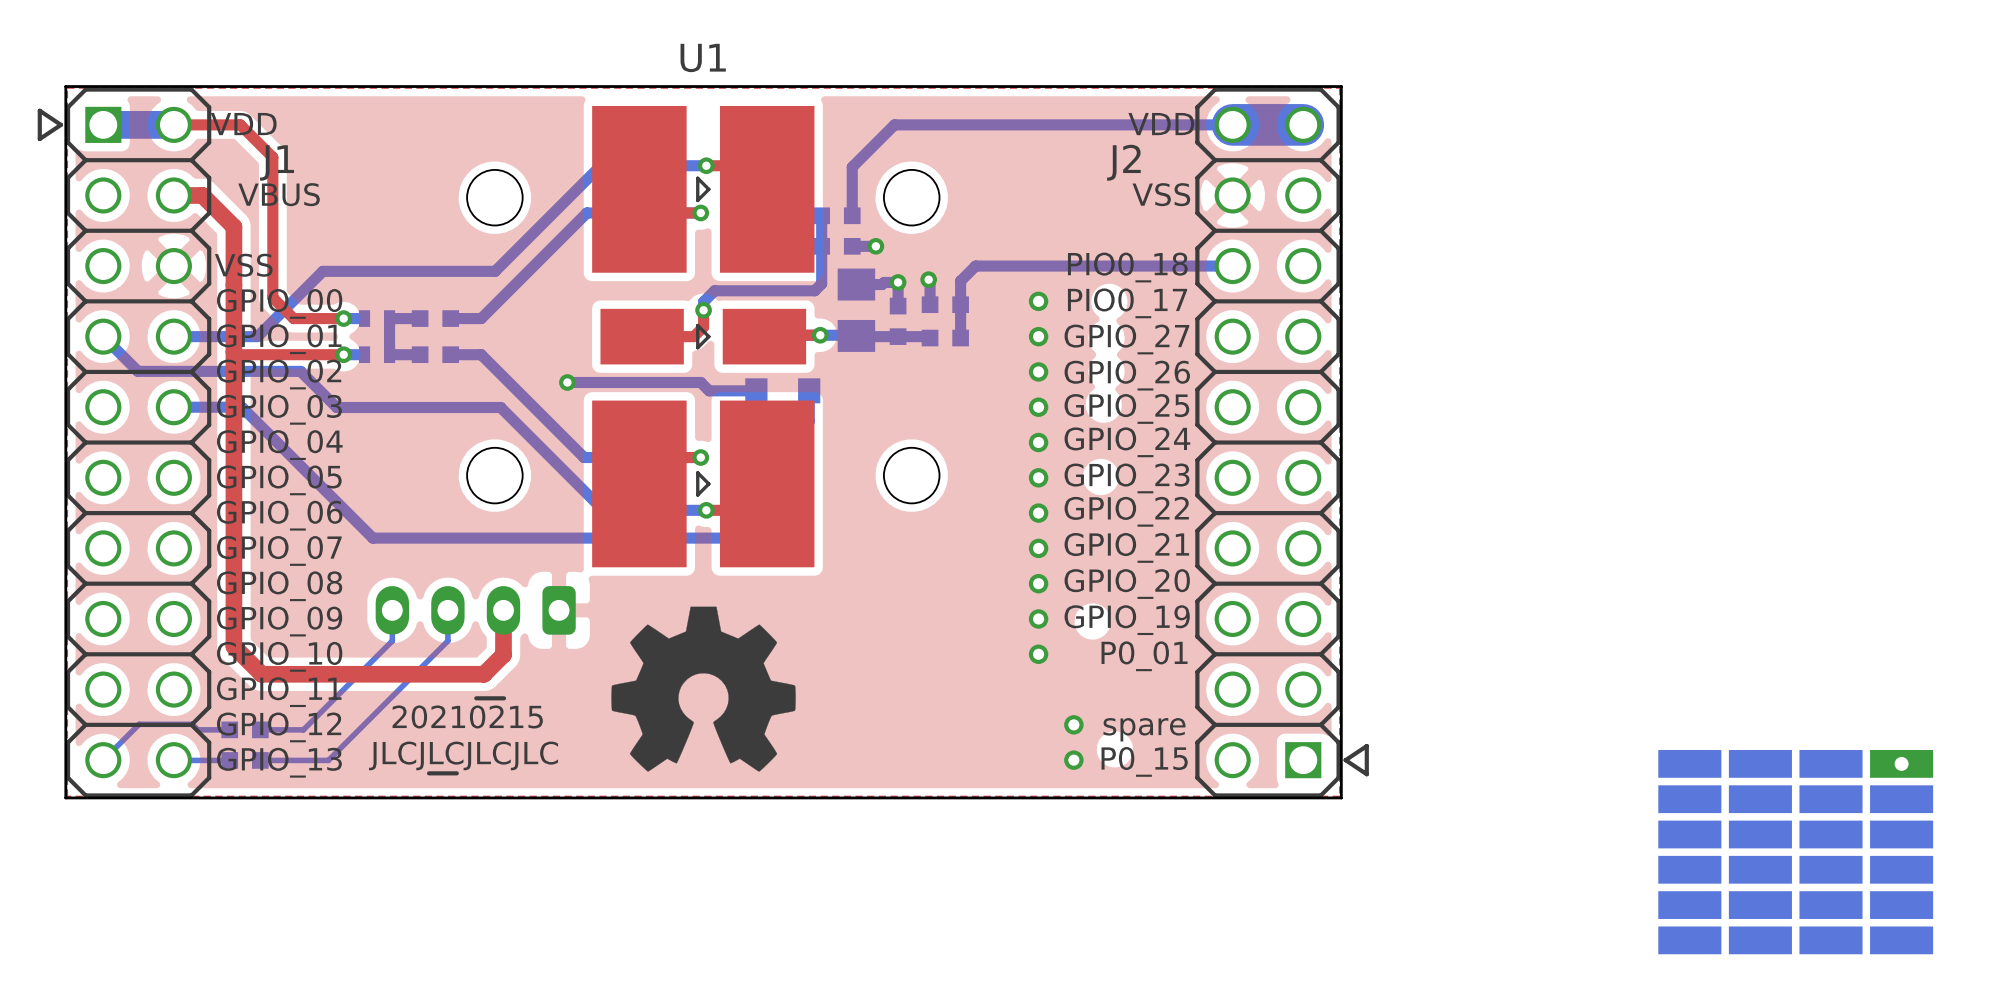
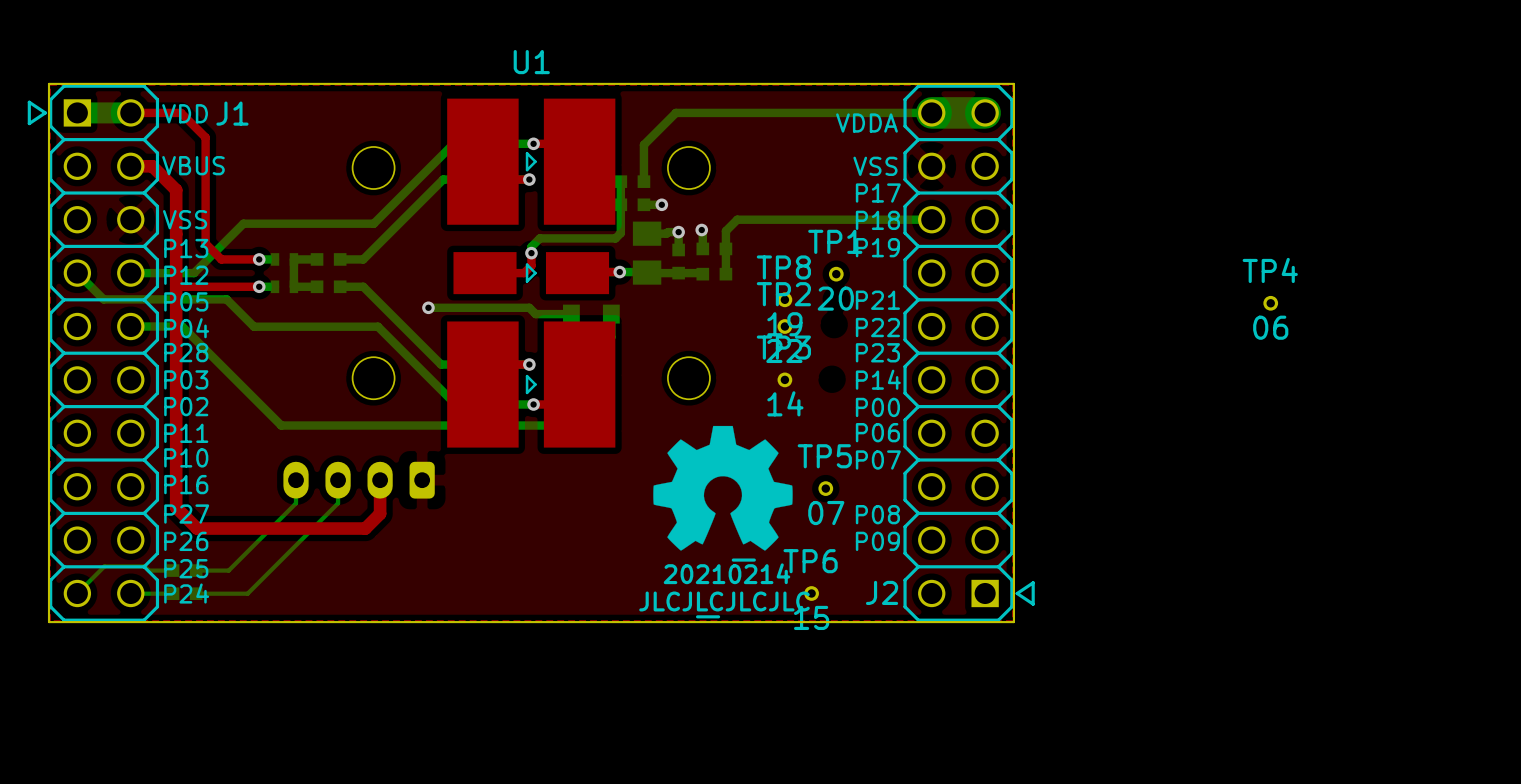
J1 footprint: [37, 87, 212, 798] -> [27, 84, 160, 622]
J2 footprint: [1195, 87, 1369, 798] -> [903, 84, 1035, 622]
text: none -> VDD (185, 113)
text: none -> VDDA (866, 123)
J2 name position: J2 (1123, 162) -> J2 (882, 592)
text: none -> VBUS (193, 165)
text: none -> VSS (875, 166)
text: none -> P17 (878, 193)
text: none -> VSS (185, 219)
text: none -> P18 (877, 220)
part: (1038, 301) -> none
text: none -> P19 (877, 247)
text: none -> P13 (186, 248)
TP1 position: (1038, 336) -> (836, 274)
text: none -> P12 (186, 275)
text: none -> P21 (877, 300)
text: none -> P05 (186, 301)
text: none -> P22 (877, 327)
text: none -> P04 (186, 328)
text: none -> P28 (186, 352)
text: none -> P23 (877, 352)
part: (1038, 442) -> none
text: none -> P03 (186, 379)
text: none -> P14 (878, 379)
text: none -> P02 (186, 406)
part: (1038, 513) -> none
text: none -> P00 (877, 407)
text: none -> P06 (877, 432)
text: none -> P11 (186, 433)
TP4 position: (1038, 548) -> (1270, 303)
text: none -> P10 (186, 457)
part: (1038, 583) -> none
text: none -> P07 (878, 460)
text: none -> P16 (186, 484)
TP5 position: (1038, 618) -> (825, 488)
text: none -> P27 (186, 514)
part: (1038, 654) -> none
text: none -> P08 (877, 514)
drawing position: (703, 689) -> (722, 488)
text: none -> P26 (186, 541)
text: none -> P09 (877, 541)
drawing: [474, 696, 507, 701] -> none
drawing: none -> [731, 558, 756, 562]
part: (1073, 724) -> none
text: none -> P25 (186, 568)
text: none -> P24 (186, 593)
drawing position: (442, 773) -> (708, 616)
part: (1795, 852) -> none

